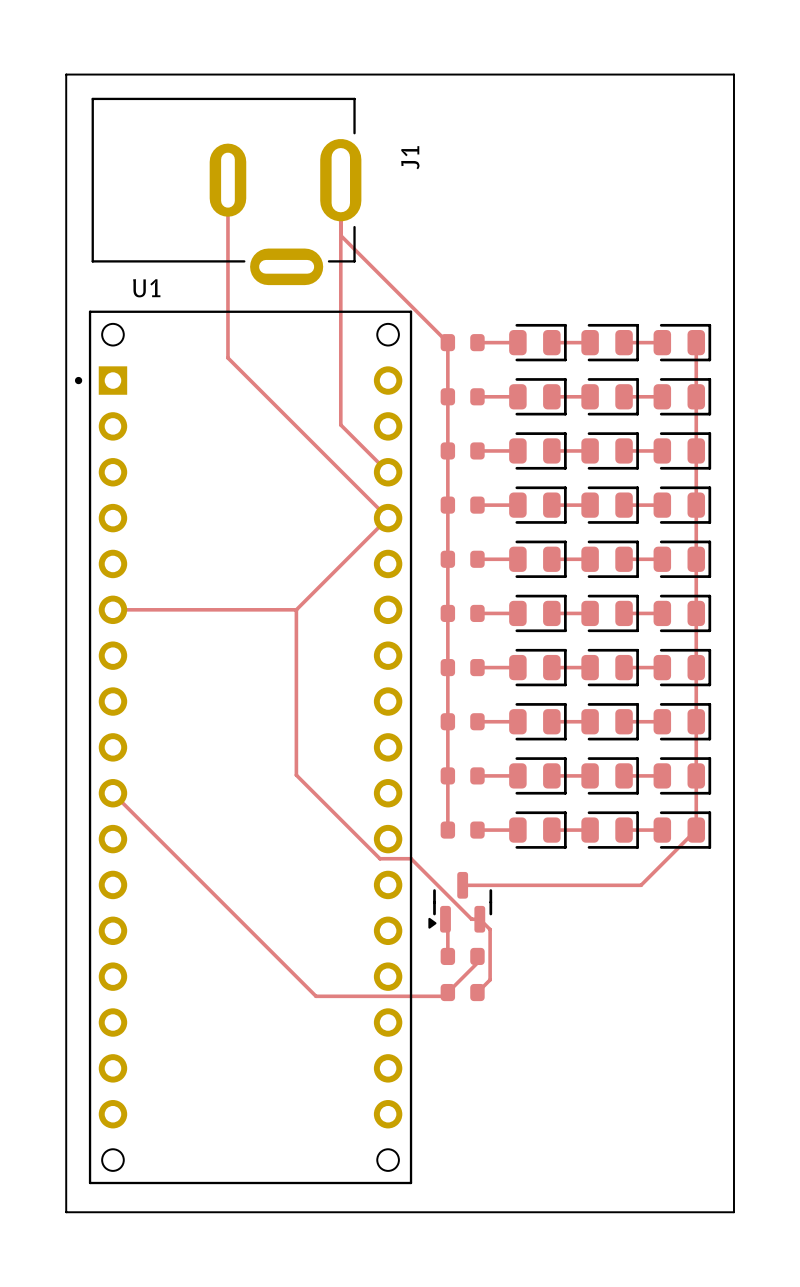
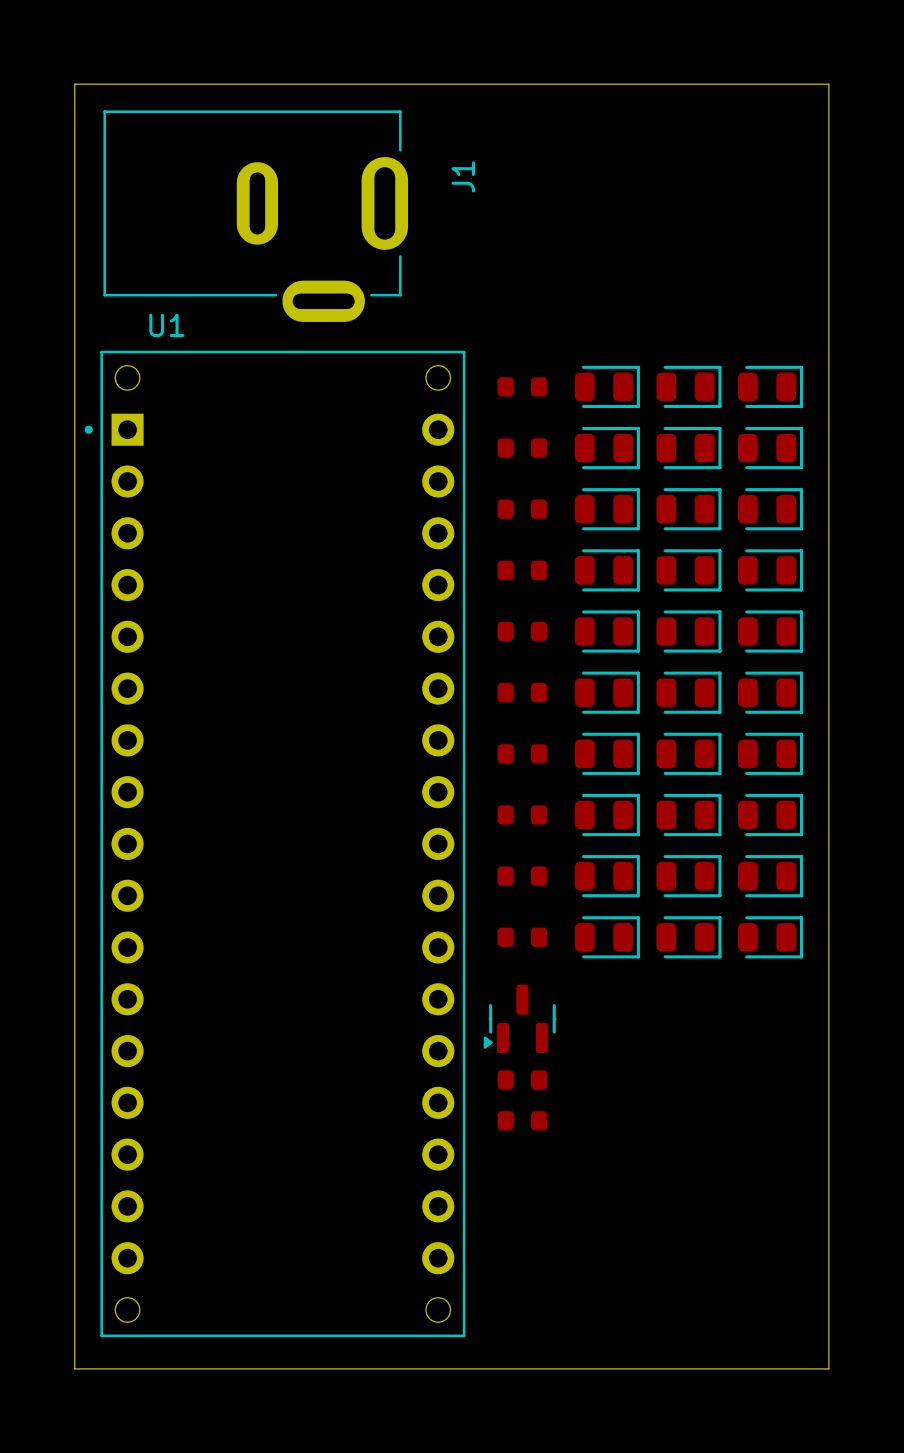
top track: (227, 180) (227, 357) (388, 518) (296, 609) -> none
top track: (340, 180) (340, 424) (388, 472) -> none
top track: (340, 235) (447, 342) (447, 830) -> none
top track: (477, 342) (517, 342) -> none
top track: (551, 342) (590, 342) -> none
top track: (624, 342) (662, 342) -> none
top track: (696, 342) (696, 830) (641, 885) (462, 885) -> none
top track: (477, 396) (517, 396) -> none
top track: (551, 396) (590, 396) -> none
top track: (624, 396) (662, 396) -> none
top track: (477, 450) (517, 450) -> none
top track: (551, 450) (590, 450) -> none
top track: (624, 450) (662, 450) -> none
top track: (477, 505) (517, 505) -> none
top track: (551, 505) (590, 505) -> none
top track: (624, 505) (662, 505) -> none
top track: (477, 559) (517, 559) -> none
top track: (551, 559) (590, 559) -> none
top track: (624, 559) (662, 559) -> none
top track: (112, 609) (296, 609) -> none
top track: (296, 609) (296, 775) (379, 858) (411, 858) (471, 919) (479, 919) (490, 929) (490, 979) (477, 992) -> none
top track: (477, 613) (517, 613) -> none
top track: (551, 613) (590, 613) -> none
top track: (624, 613) (662, 613) -> none
top track: (477, 667) (517, 667) -> none
top track: (551, 667) (590, 667) -> none
top track: (624, 667) (662, 667) -> none
top track: (477, 721) (517, 721) -> none
top track: (551, 721) (590, 721) -> none
top track: (624, 721) (662, 721) -> none
top track: (477, 775) (517, 775) -> none
top track: (551, 775) (590, 775) -> none
top track: (624, 775) (662, 775) -> none
top track: (112, 793) (316, 996) (444, 996) (477, 962) (477, 956) -> none
top track: (477, 830) (517, 830) -> none
top track: (551, 830) (590, 830) -> none
top track: (624, 830) (662, 830) -> none
top track: (445, 919) (447, 921) (447, 956) -> none

